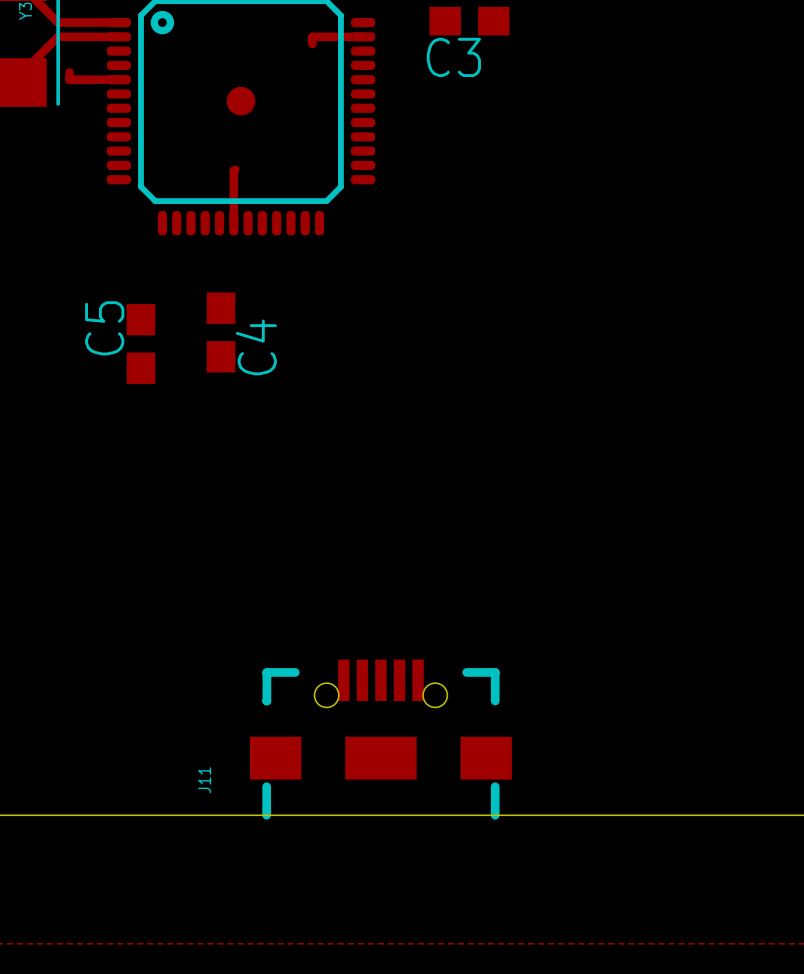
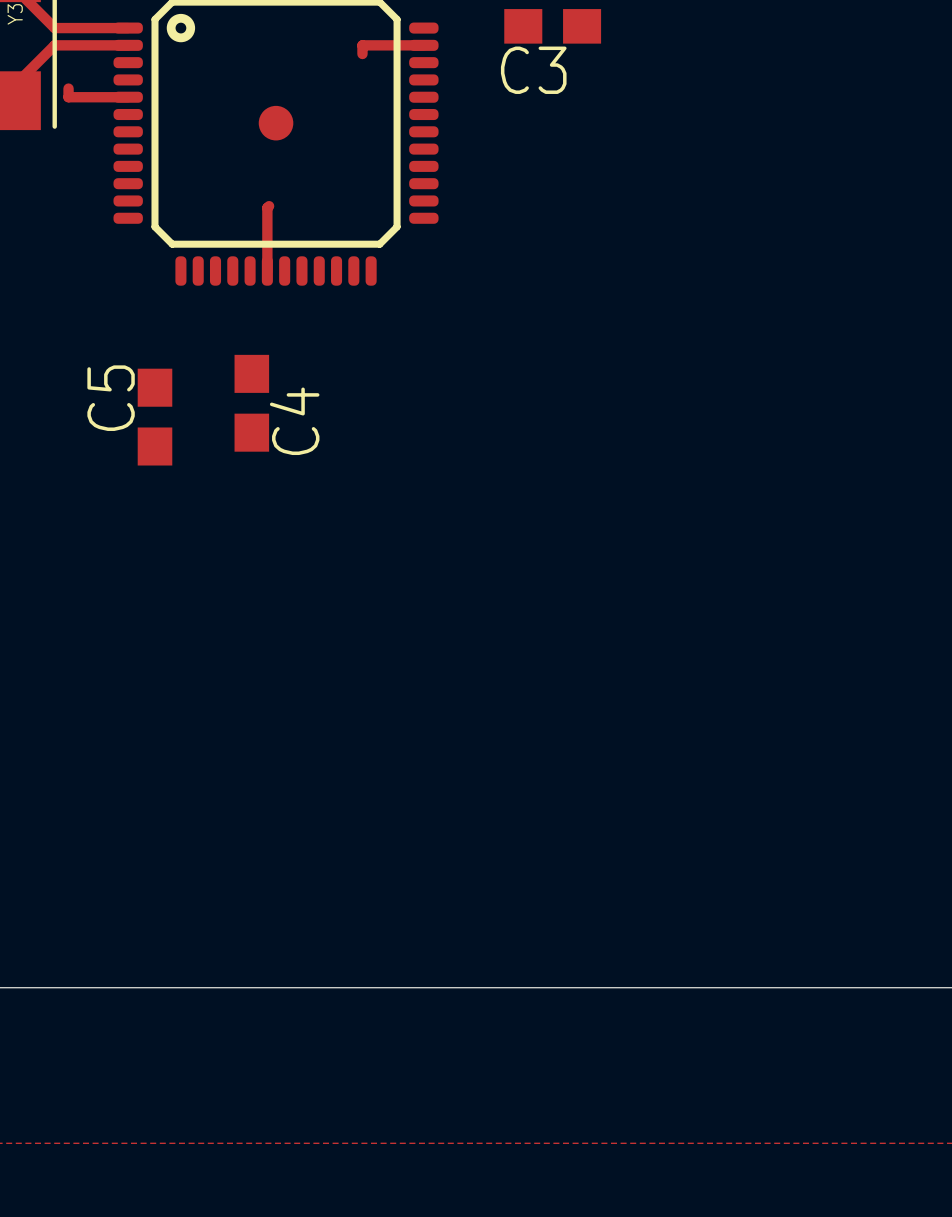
J11: (380, 739) -> none

